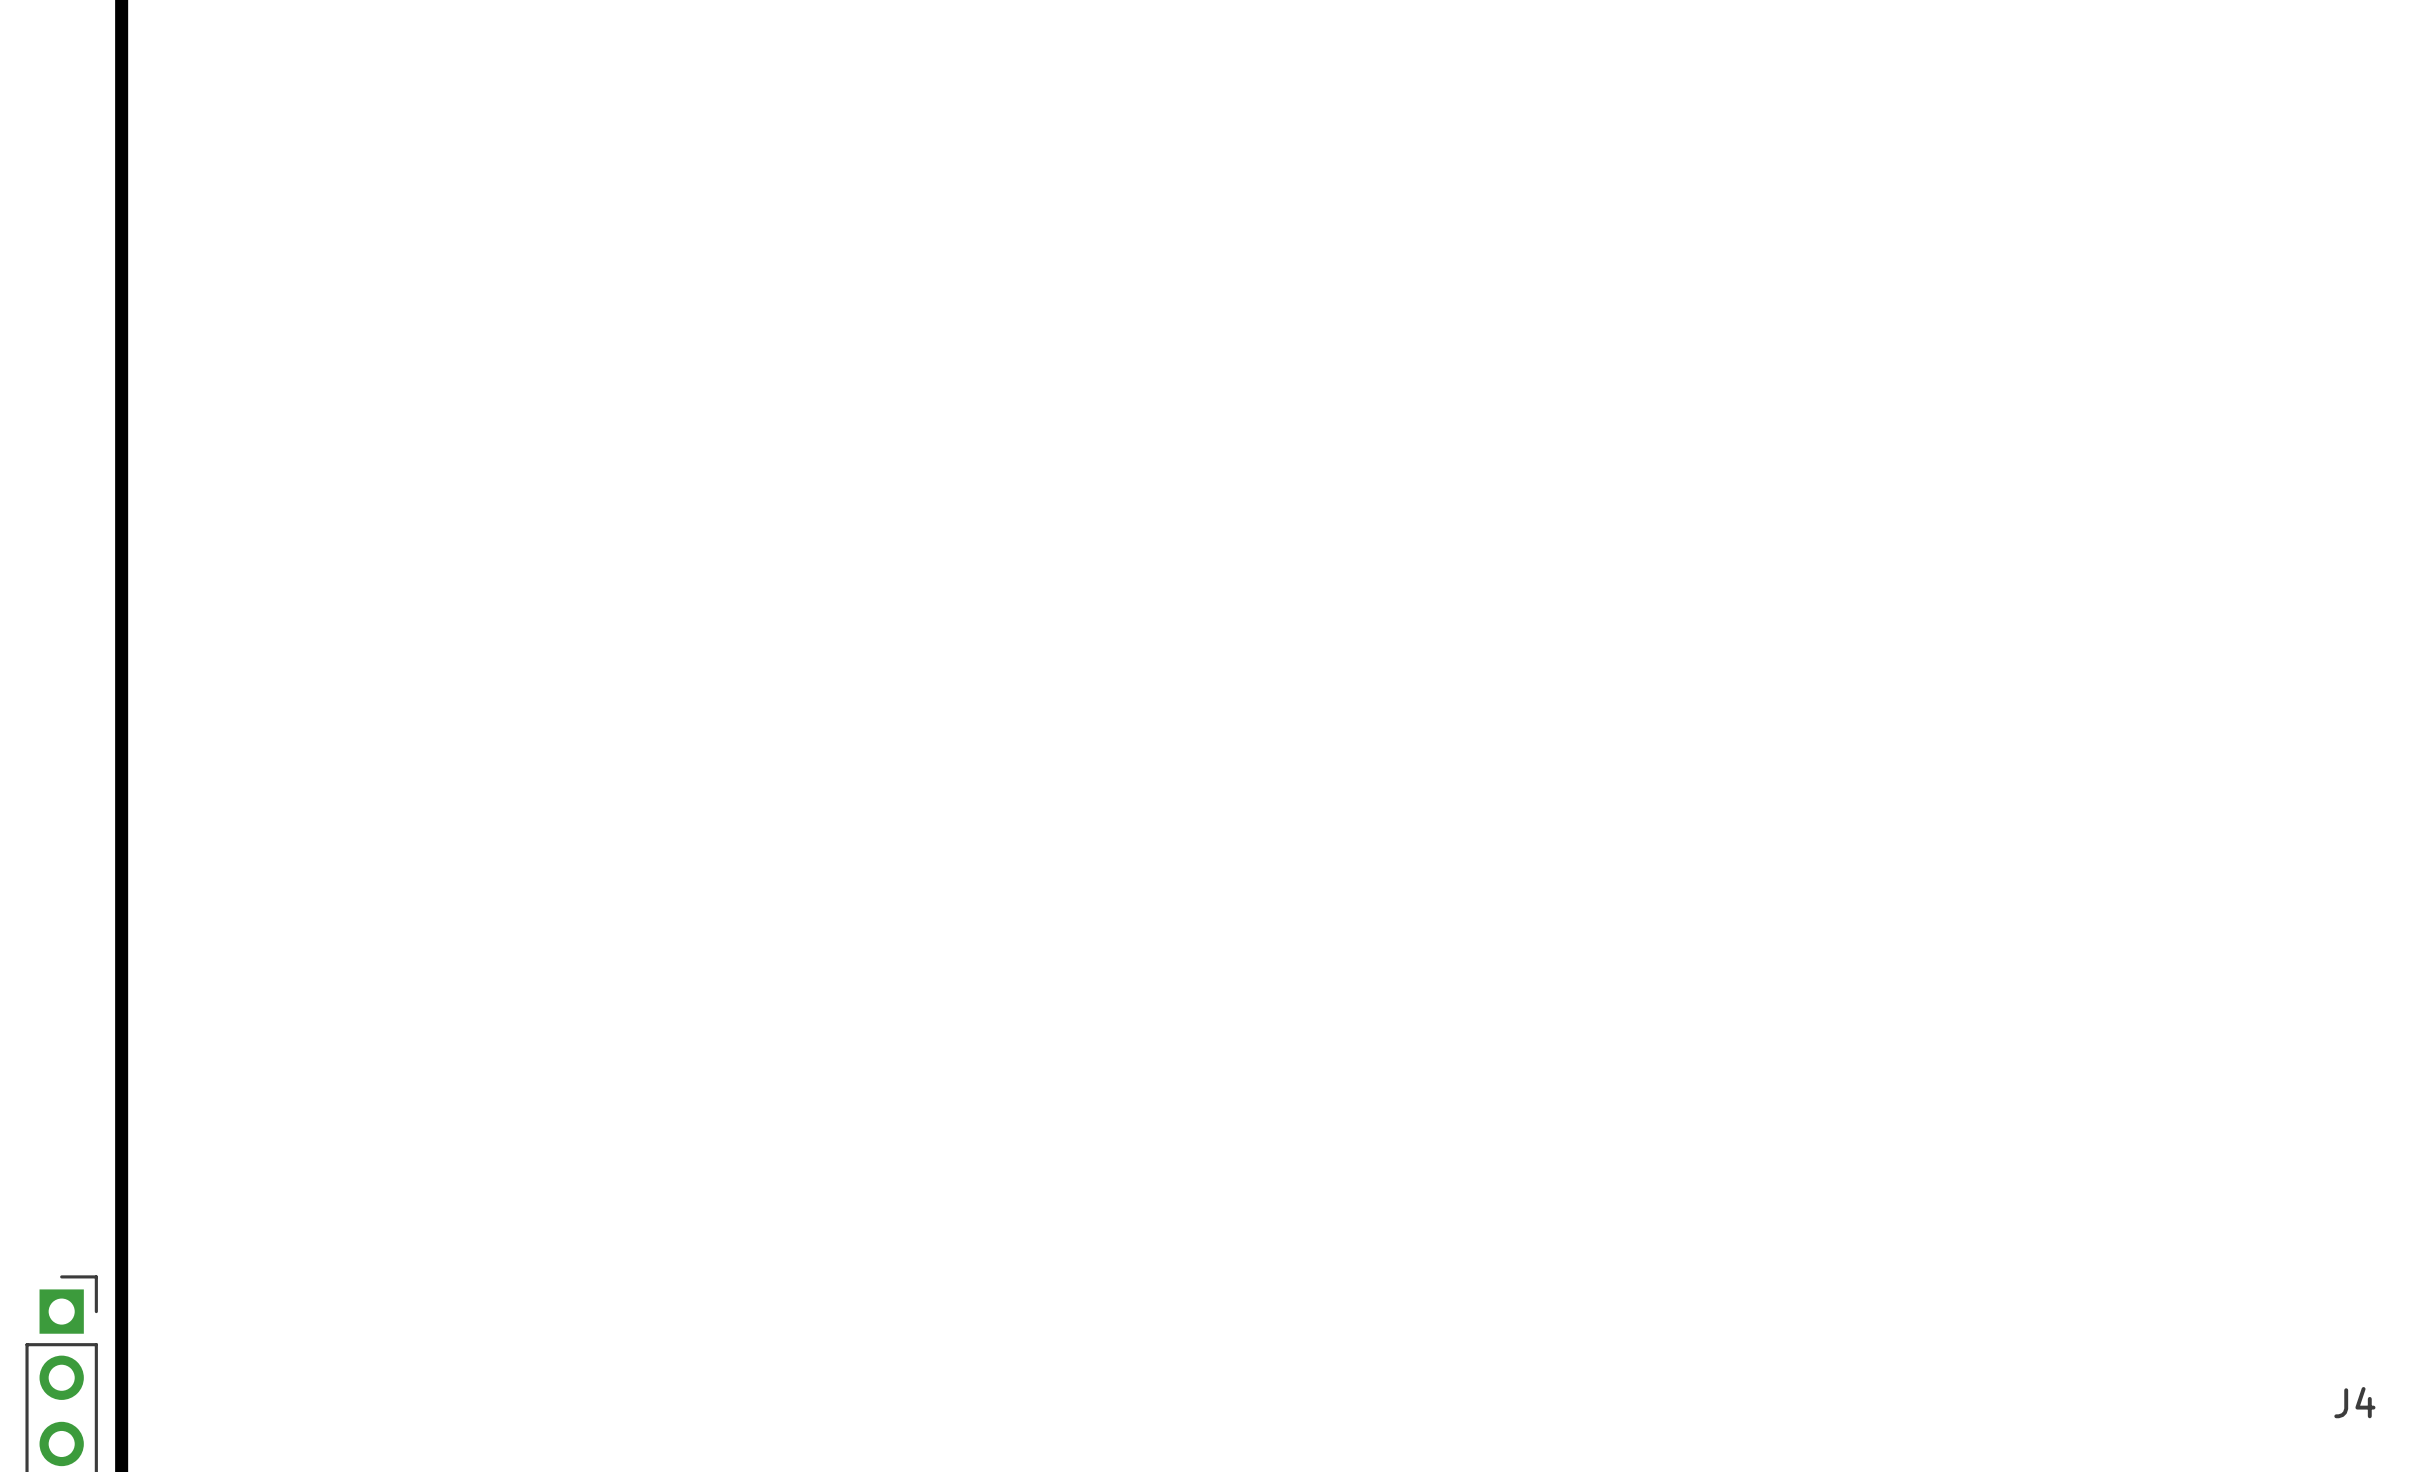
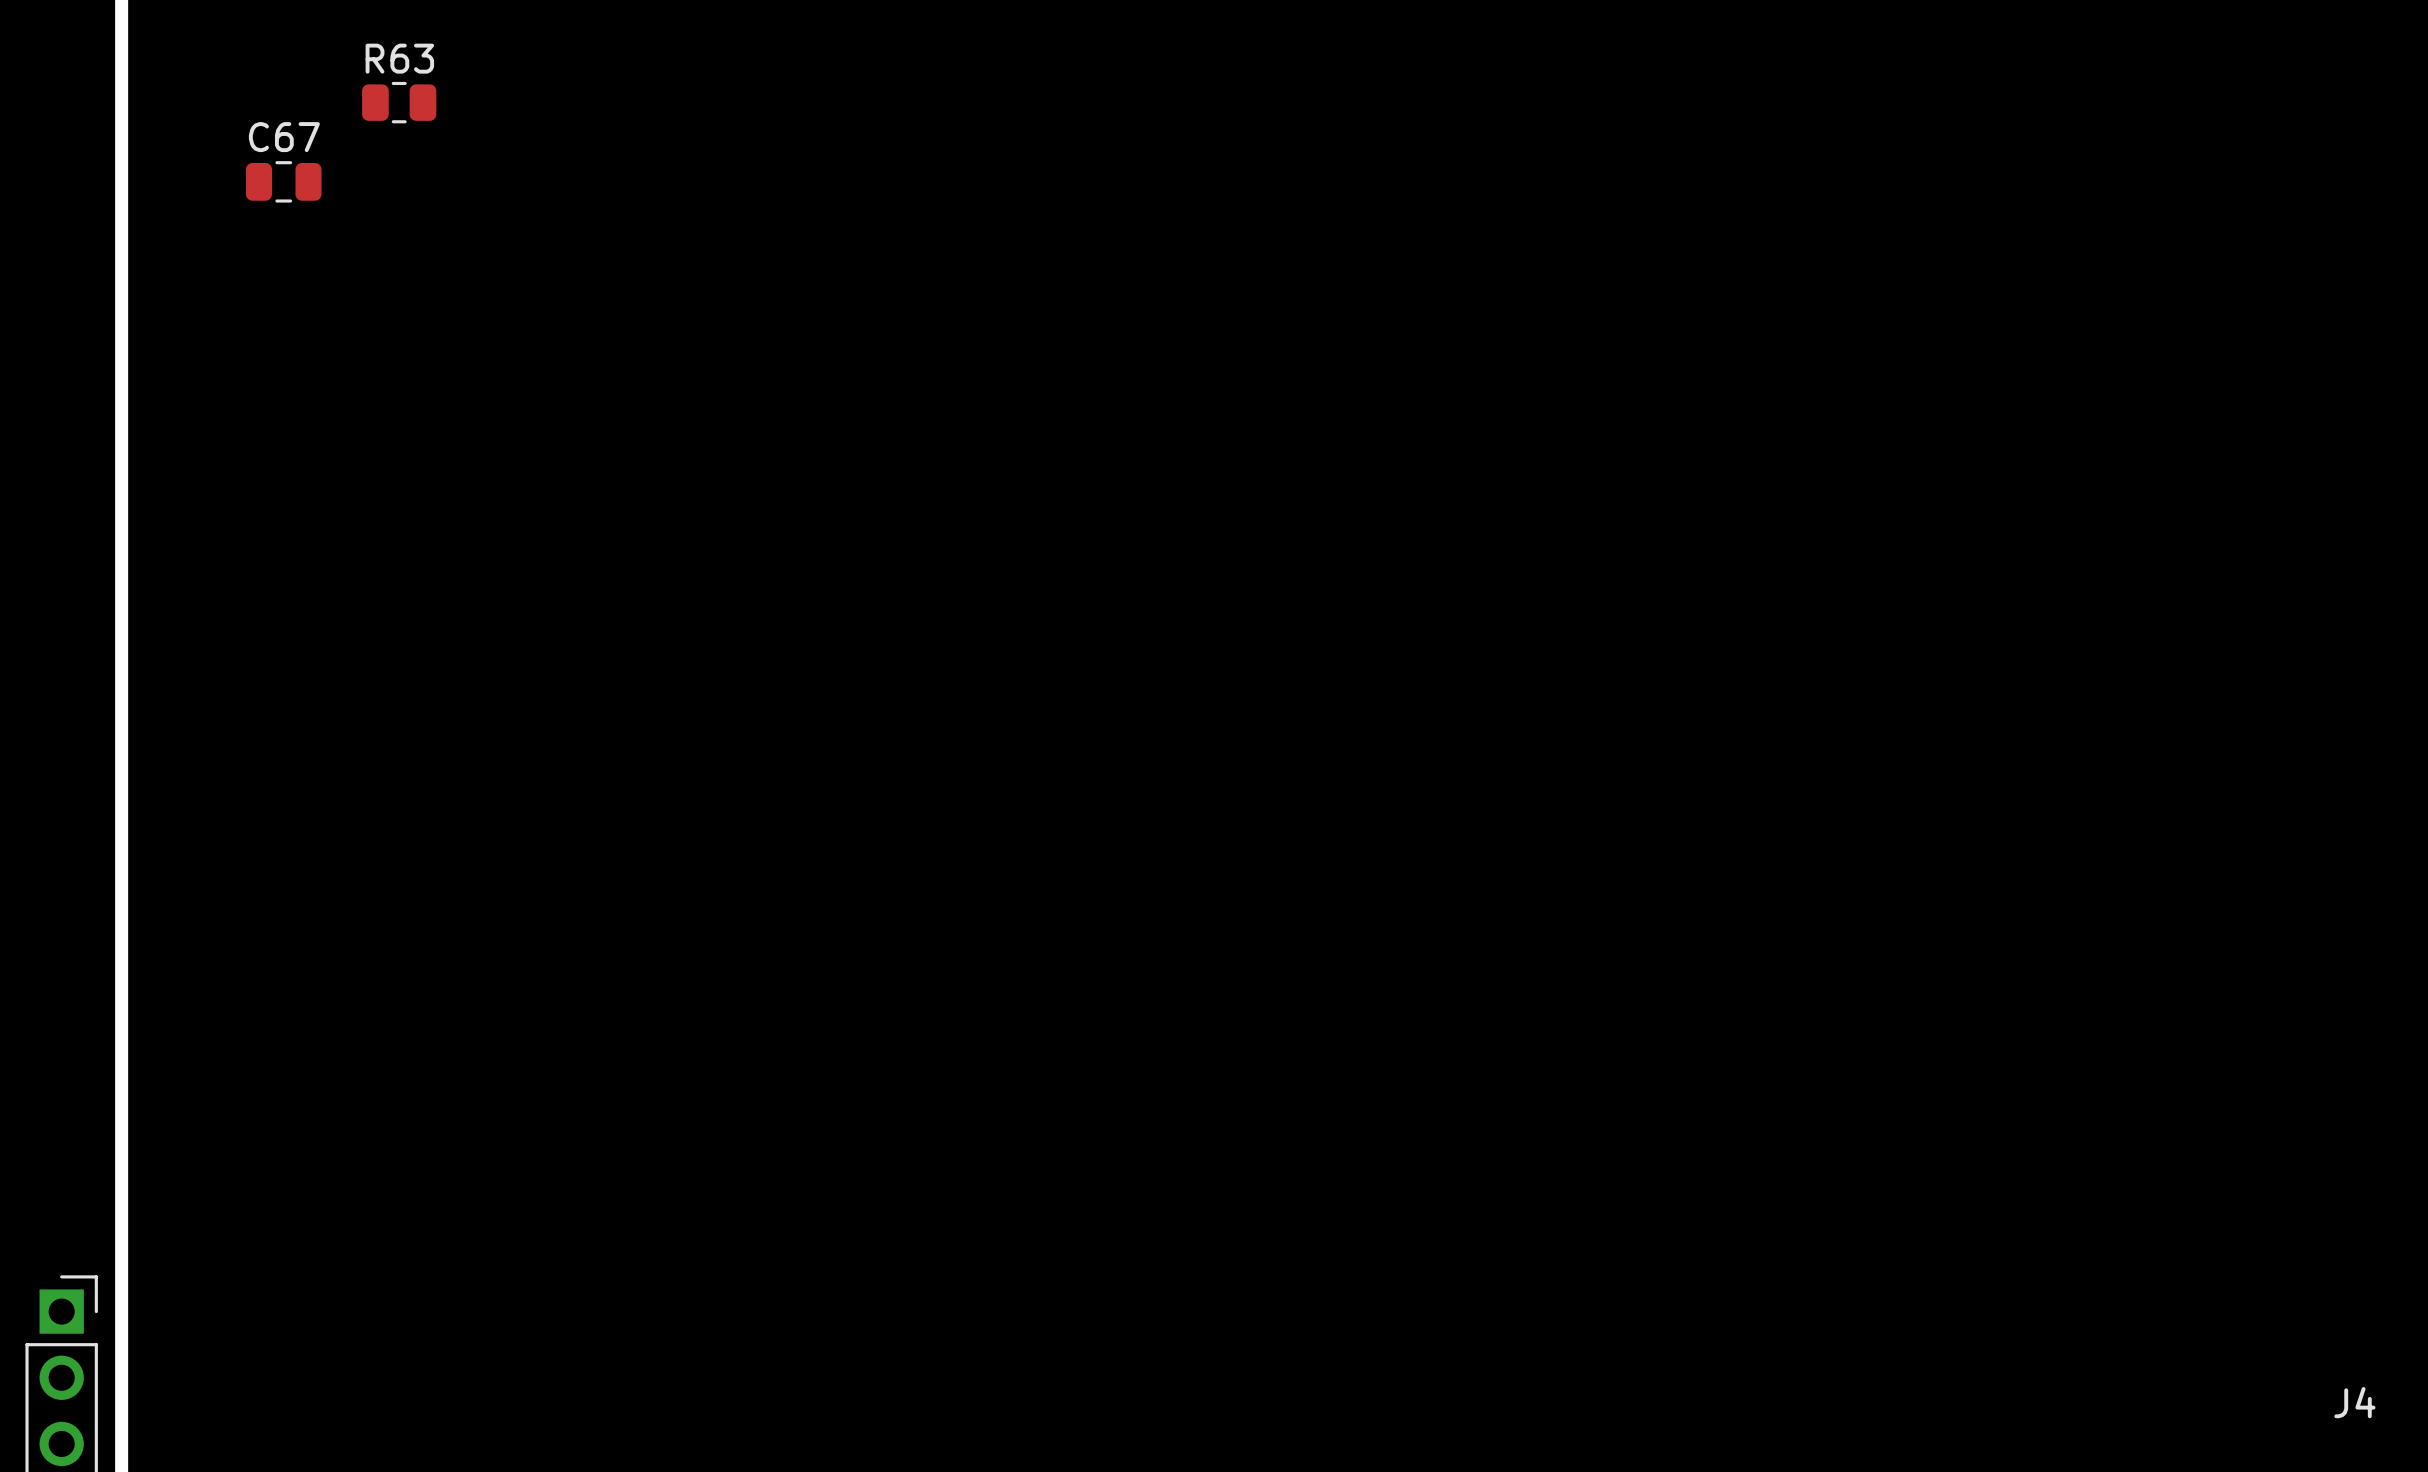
R63: none -> (399, 102)
C67: none -> (283, 181)

